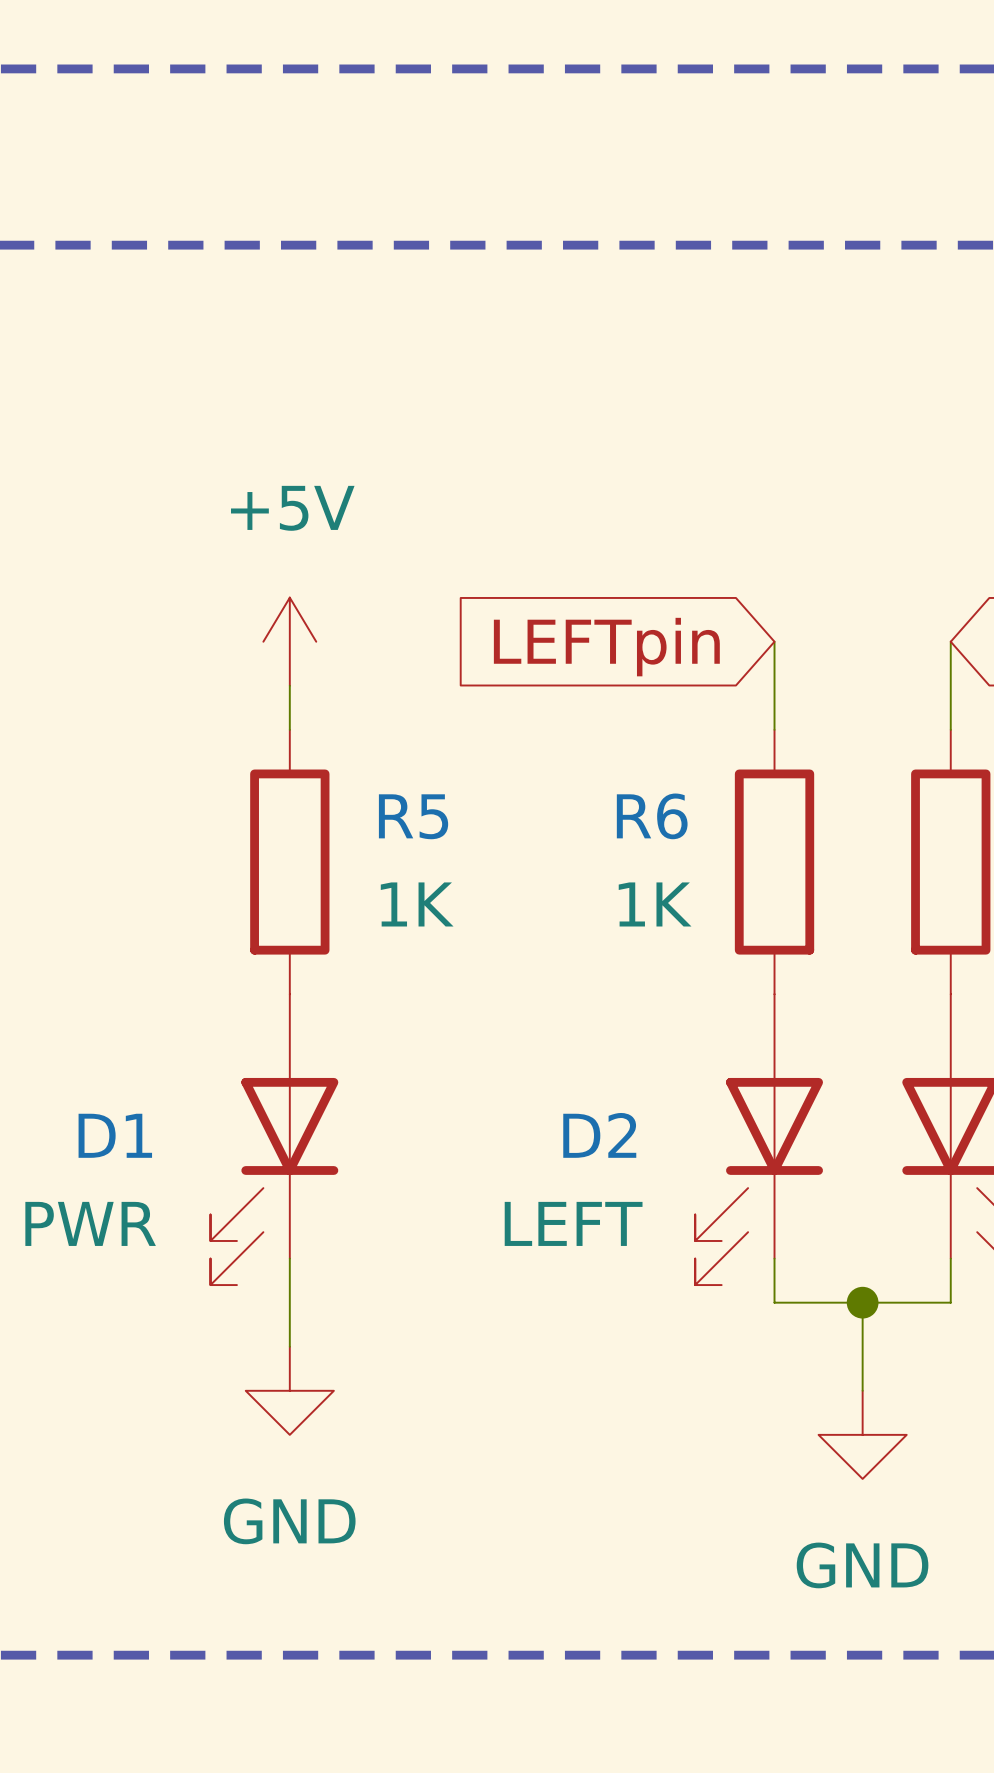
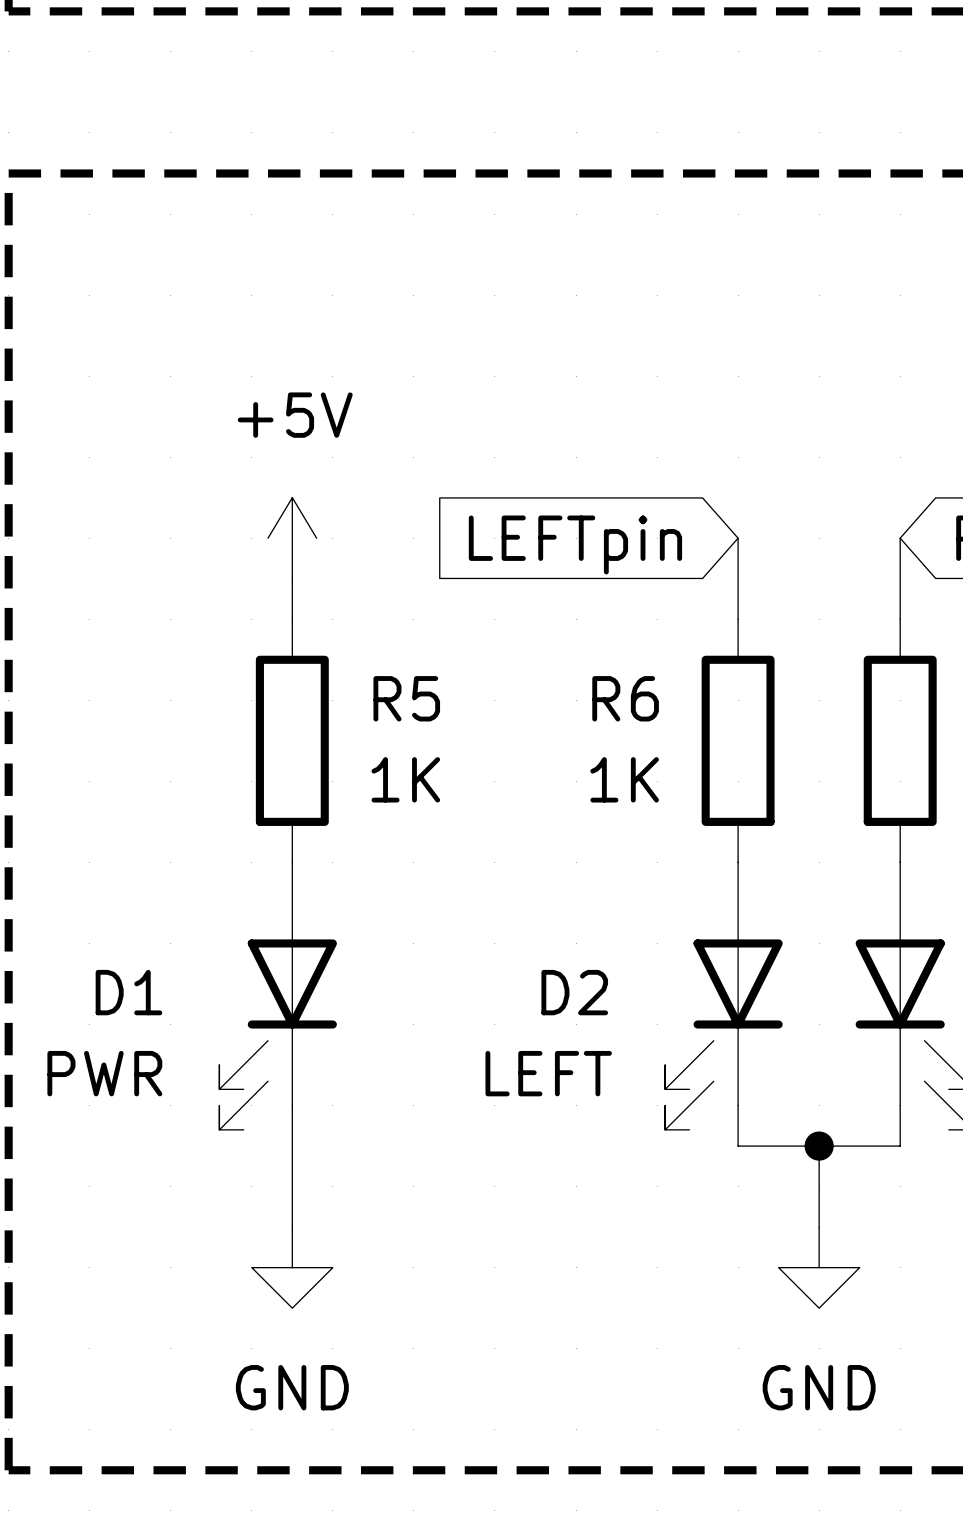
power symbol position: GND (289, 1390) -> GND (292, 1267)

